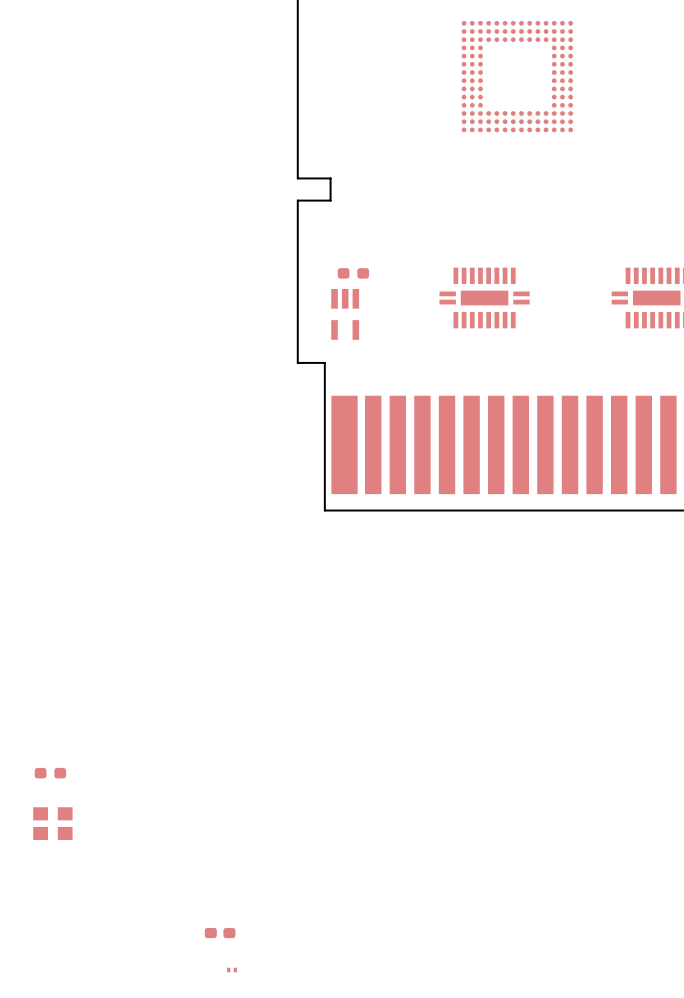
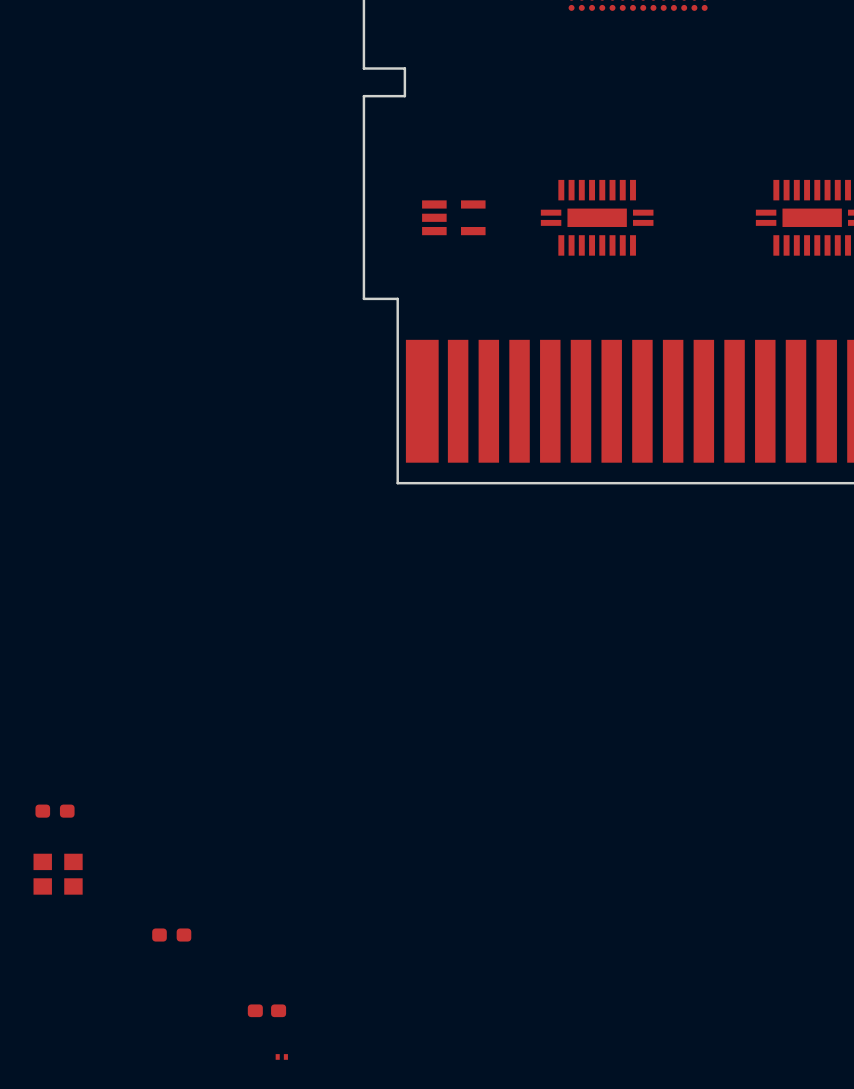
part: (353, 273) -> none
part rotation: 0° (345, 314) -> 90° counterclockwise (453, 217)
part: none -> (171, 935)

